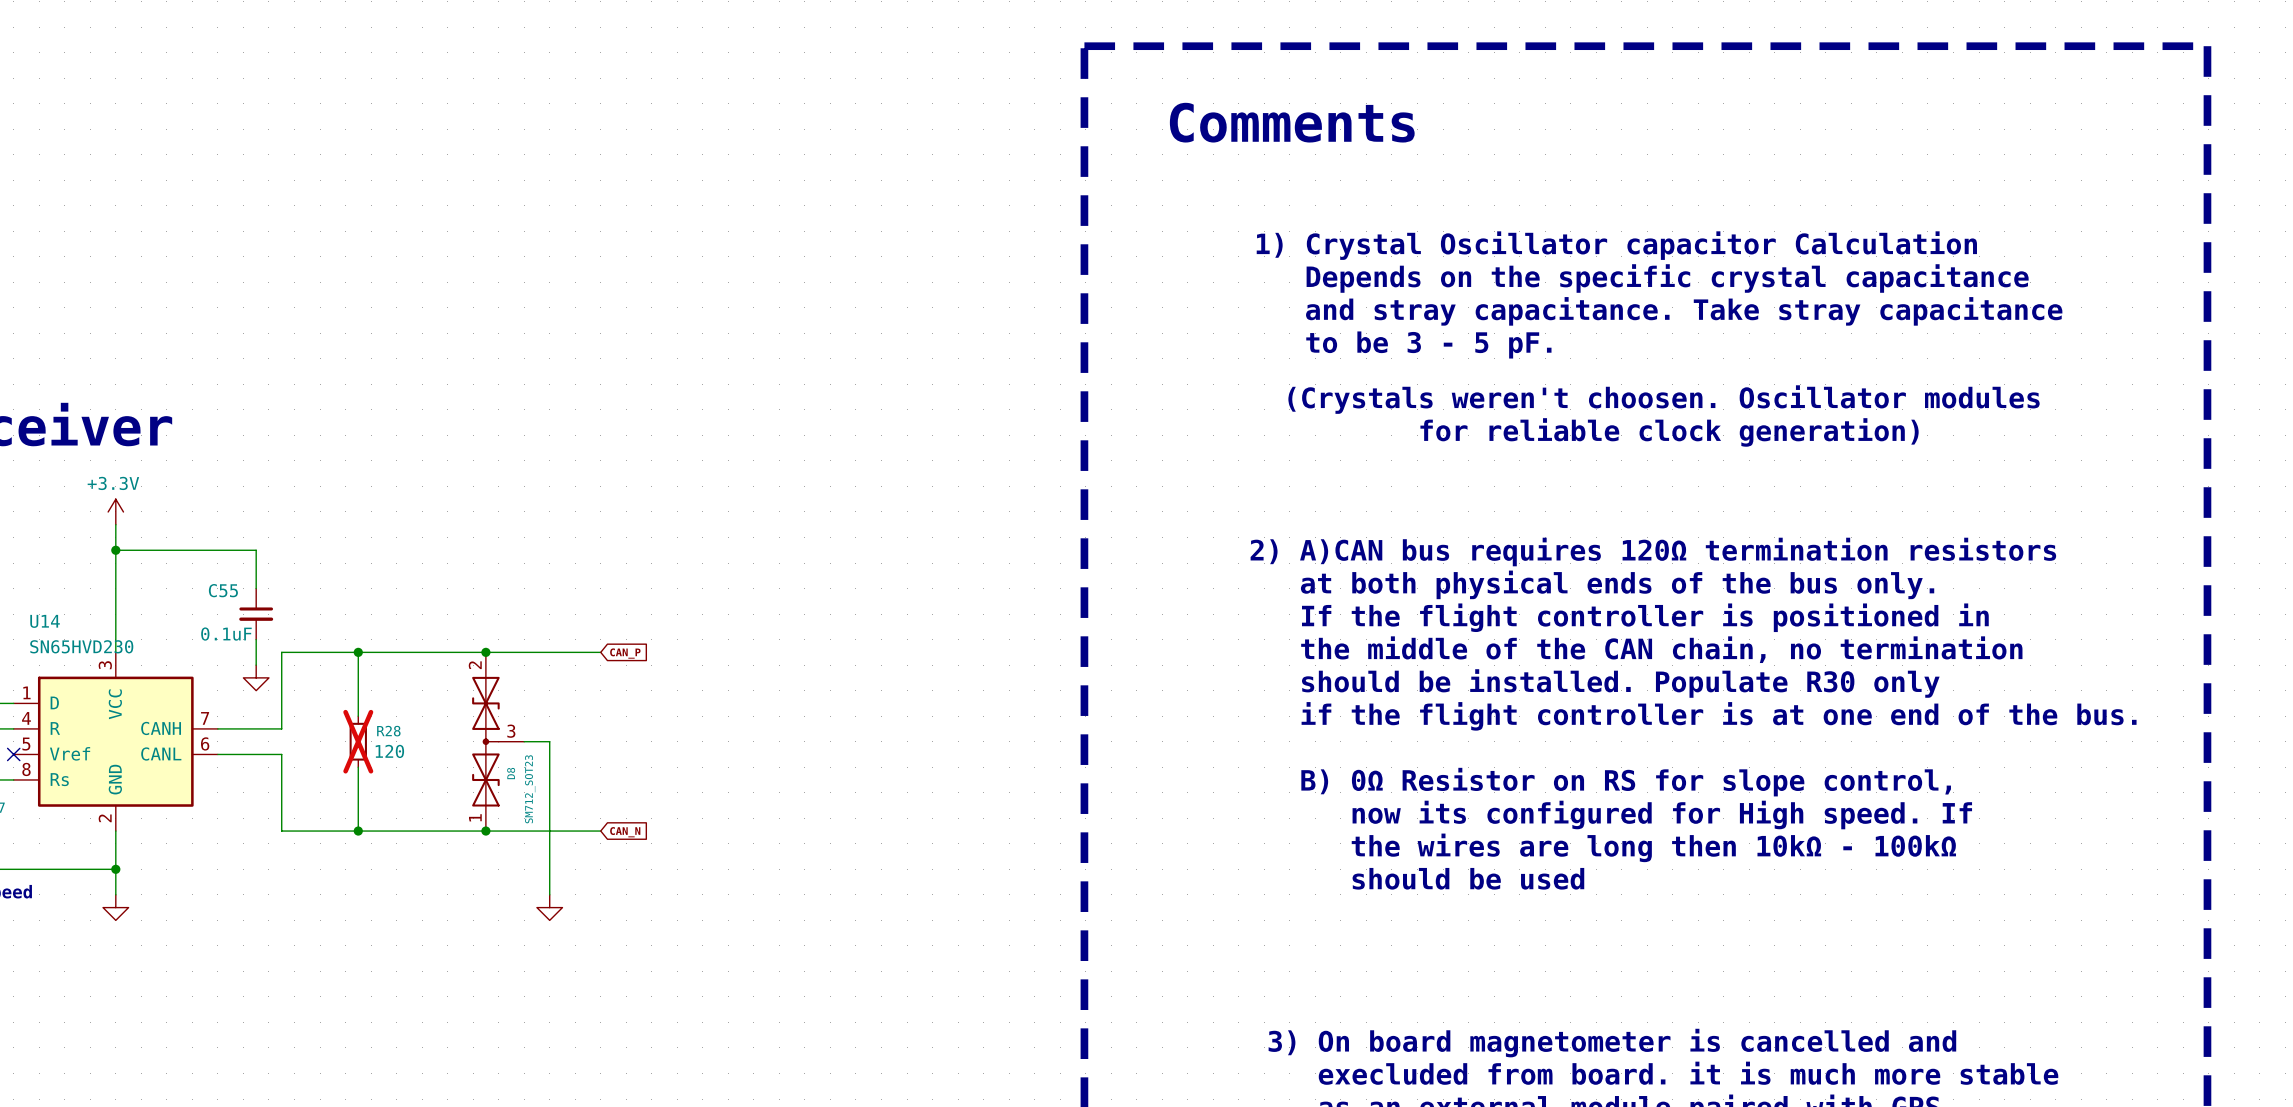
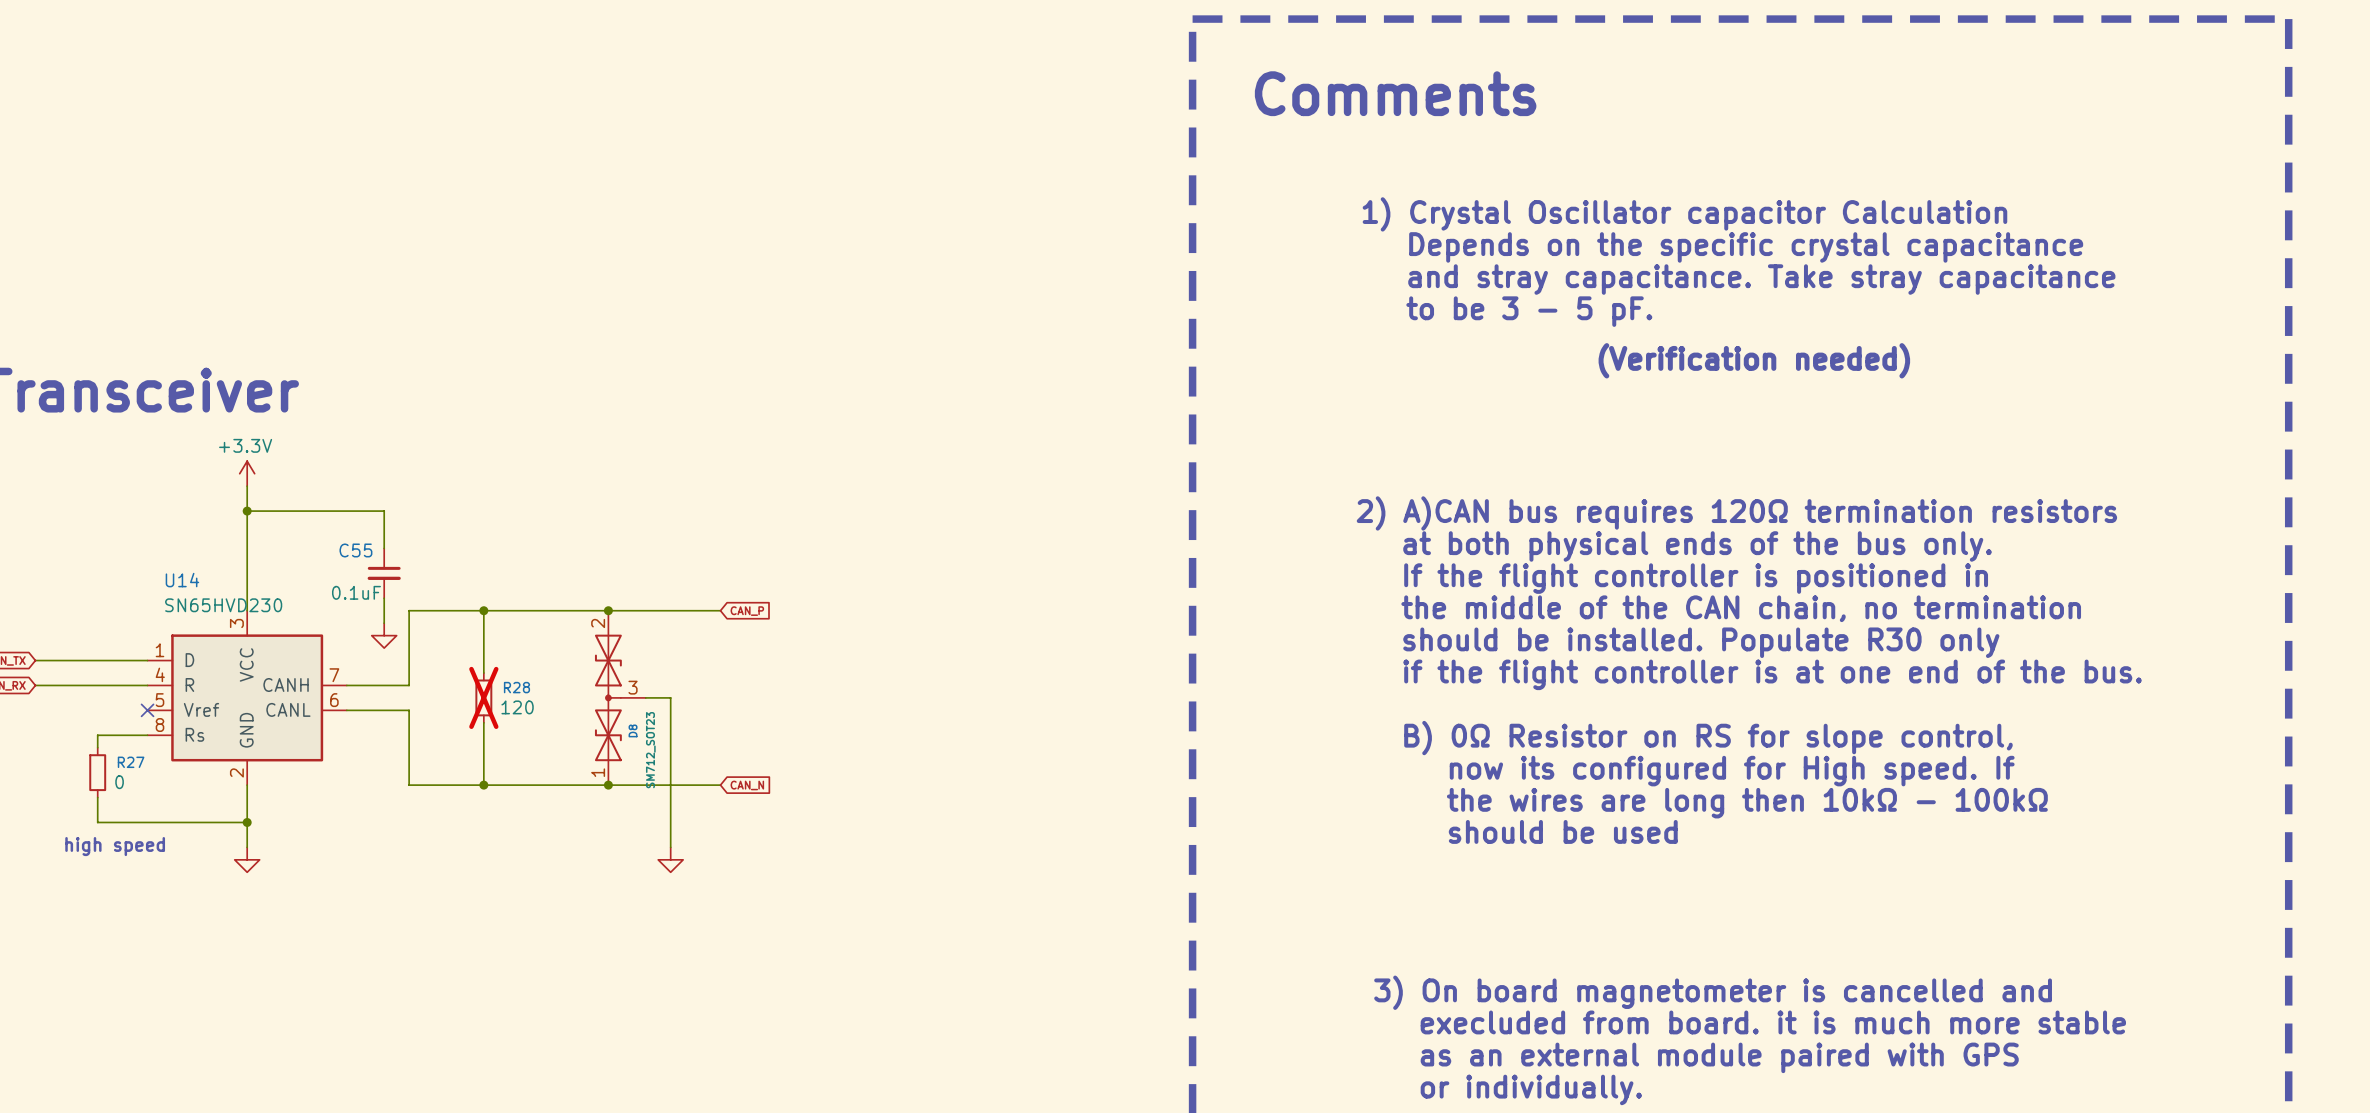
text: (Crystals weren't choosen. Oscillator modules (1664, 399) -> (Verification needed) (1754, 360)
text: for reliable clock generation) (1669, 432) -> none

